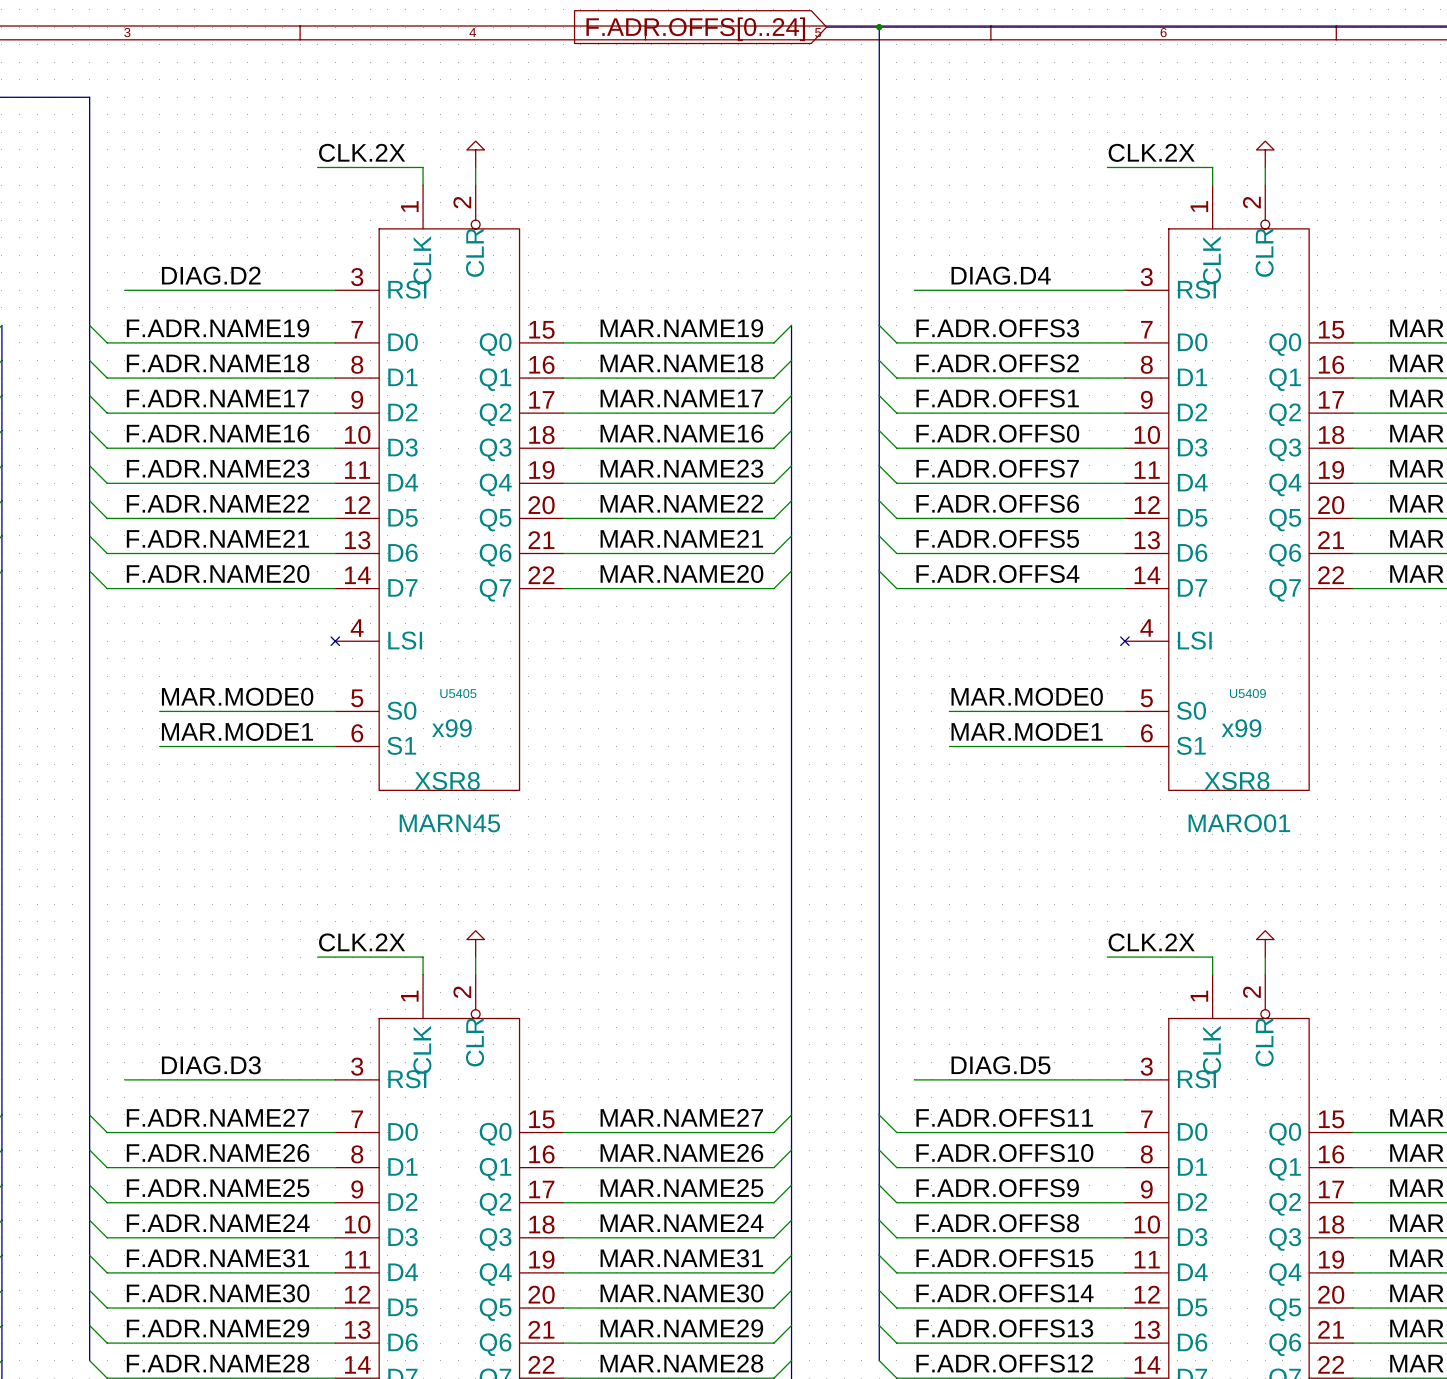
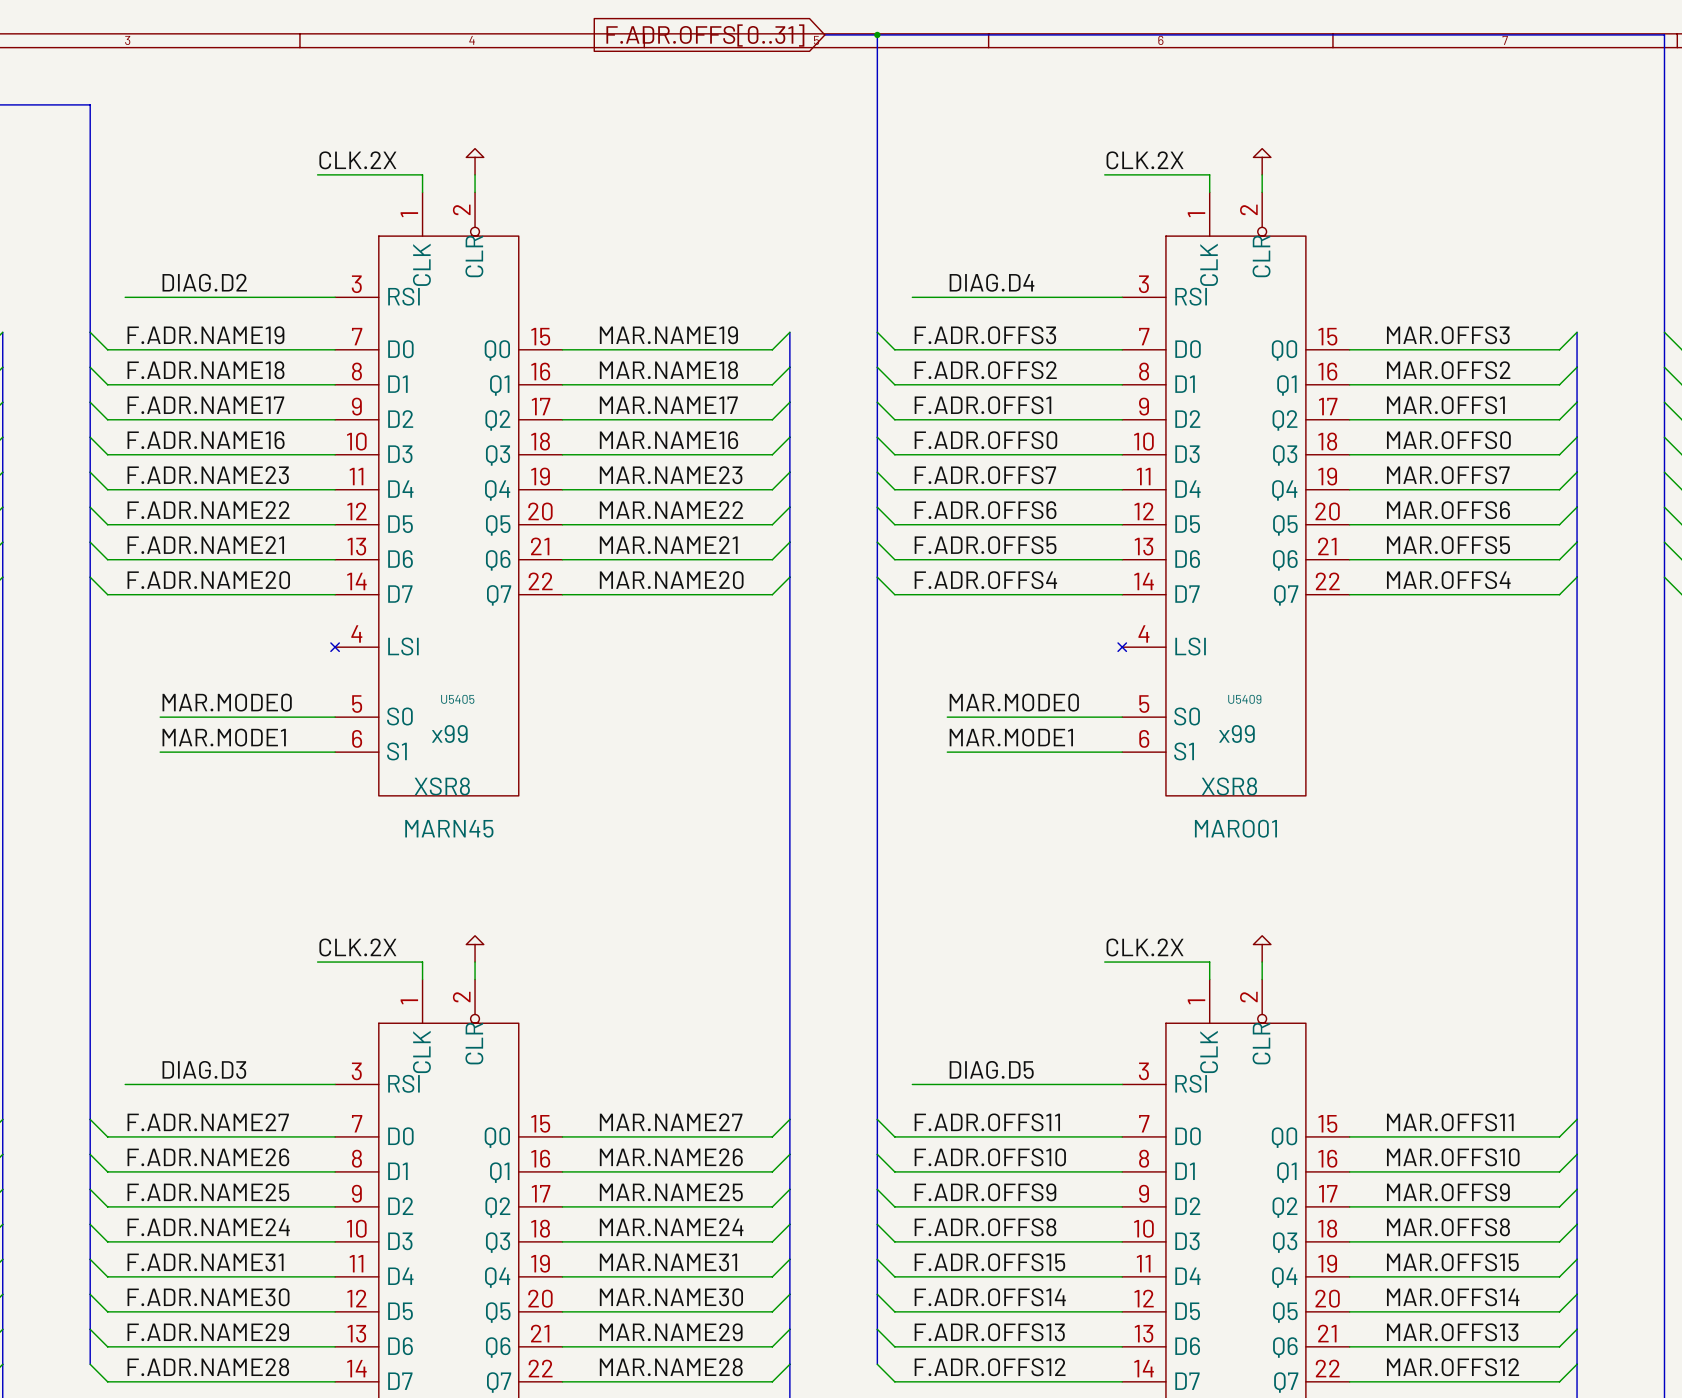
global label: F.ADR.OFFS[0..24] (695, 29) -> F.ADR.OFFS[0..31] (705, 35)

